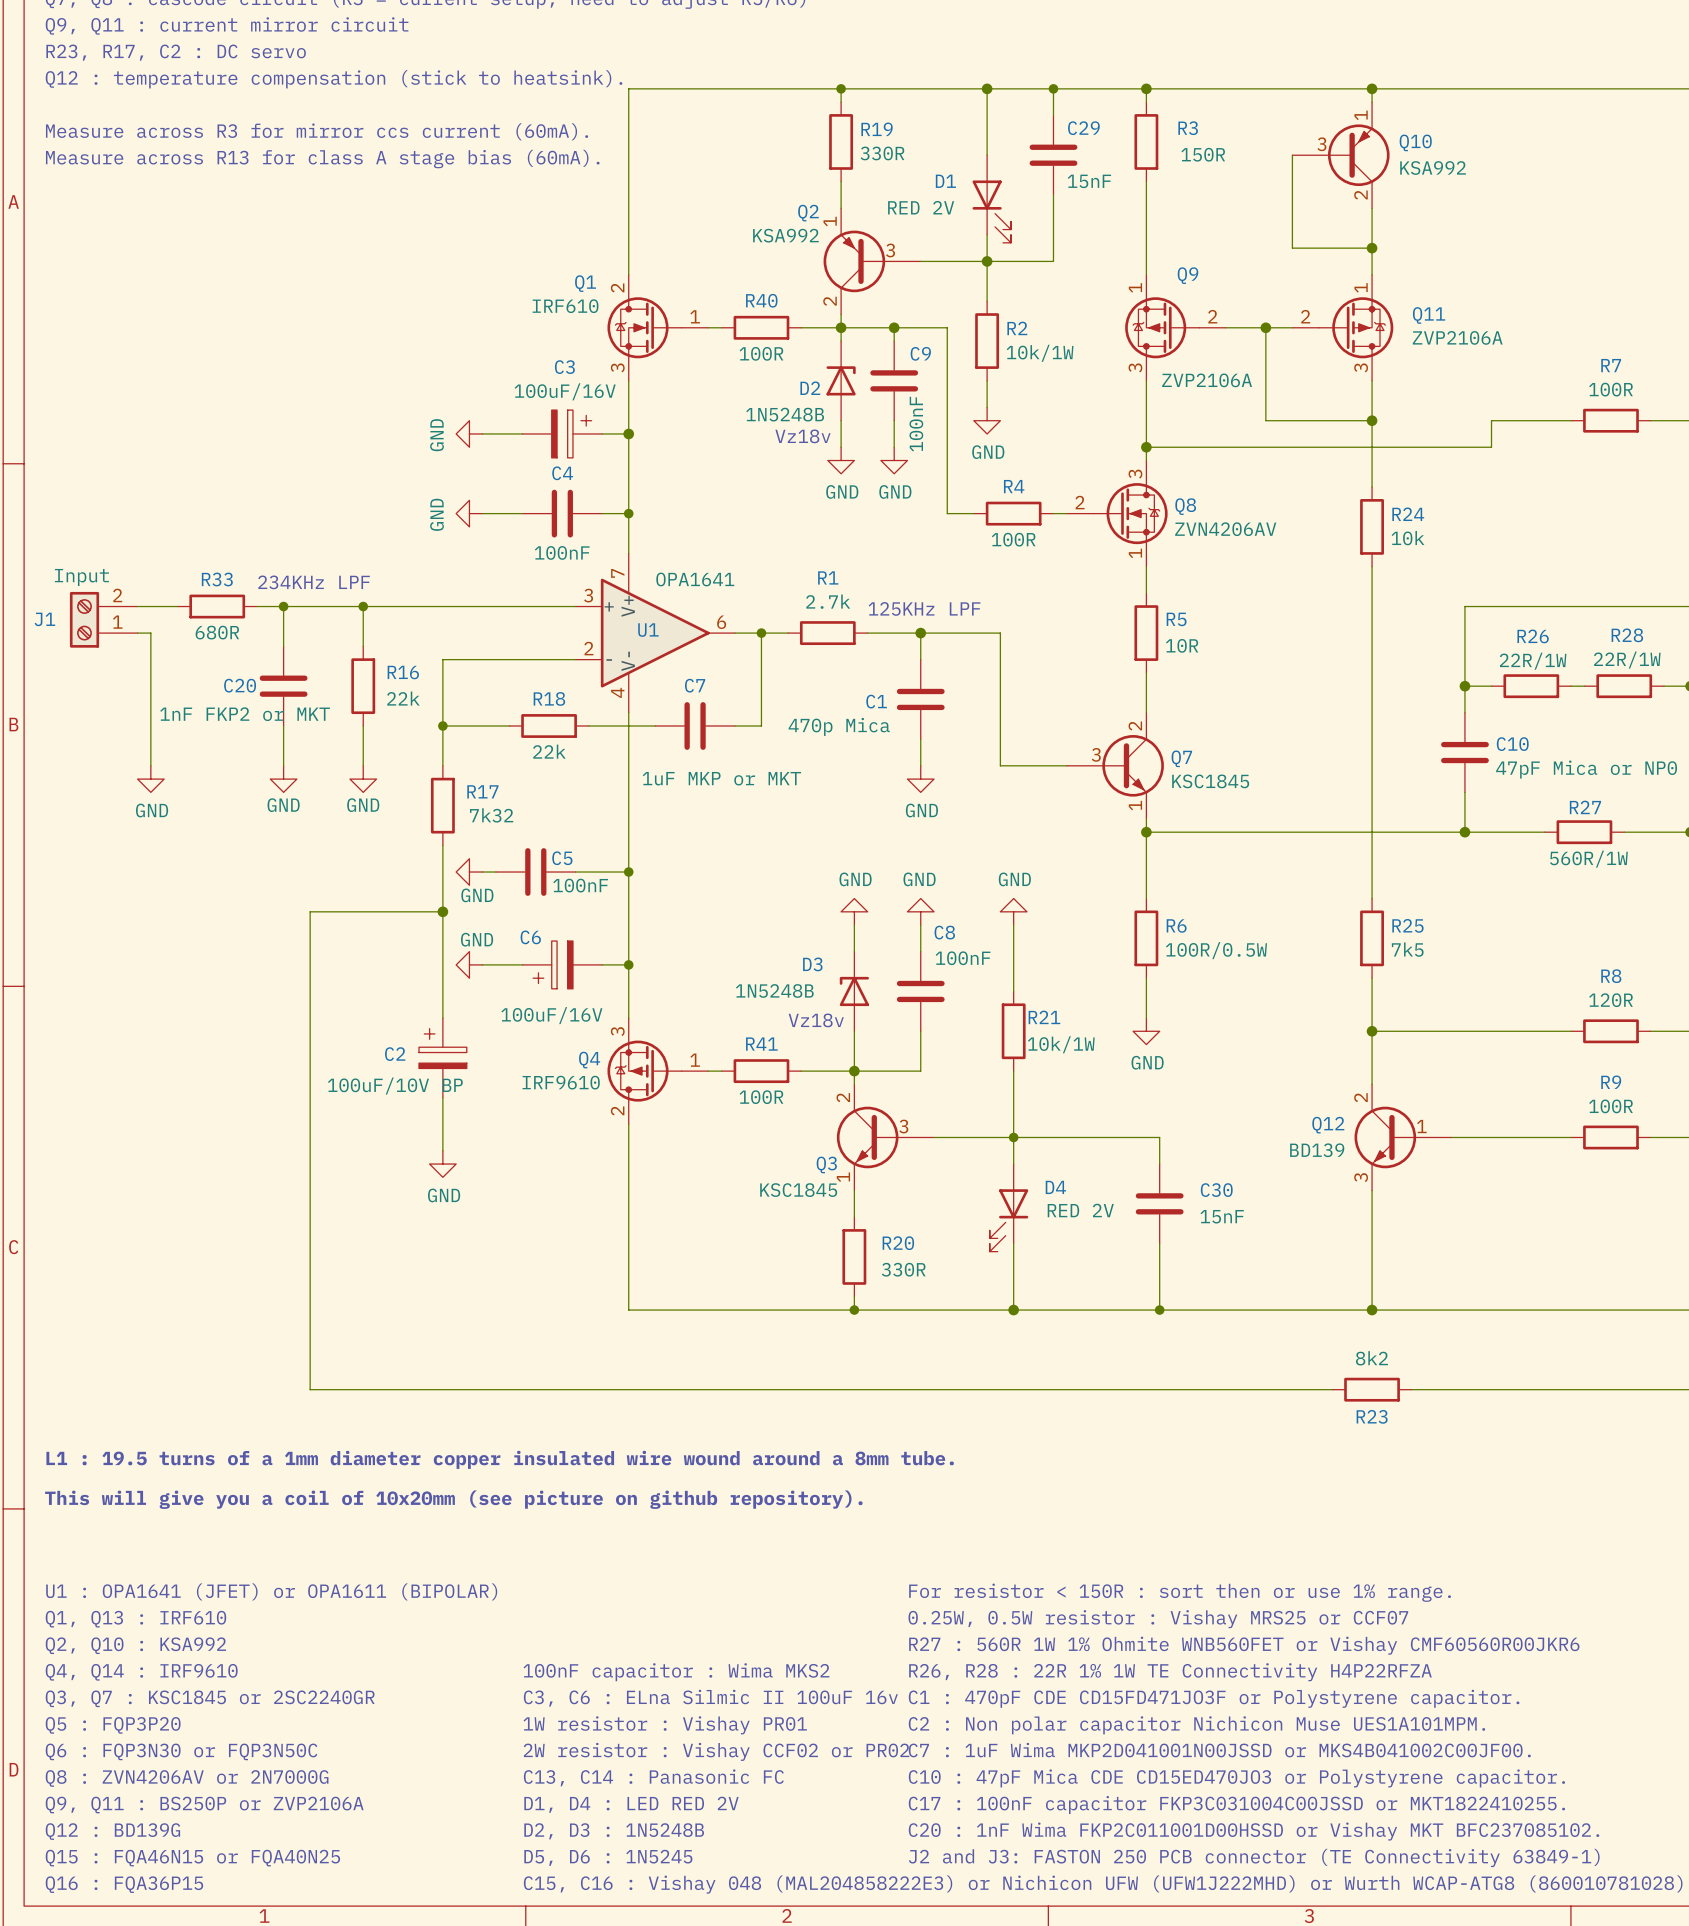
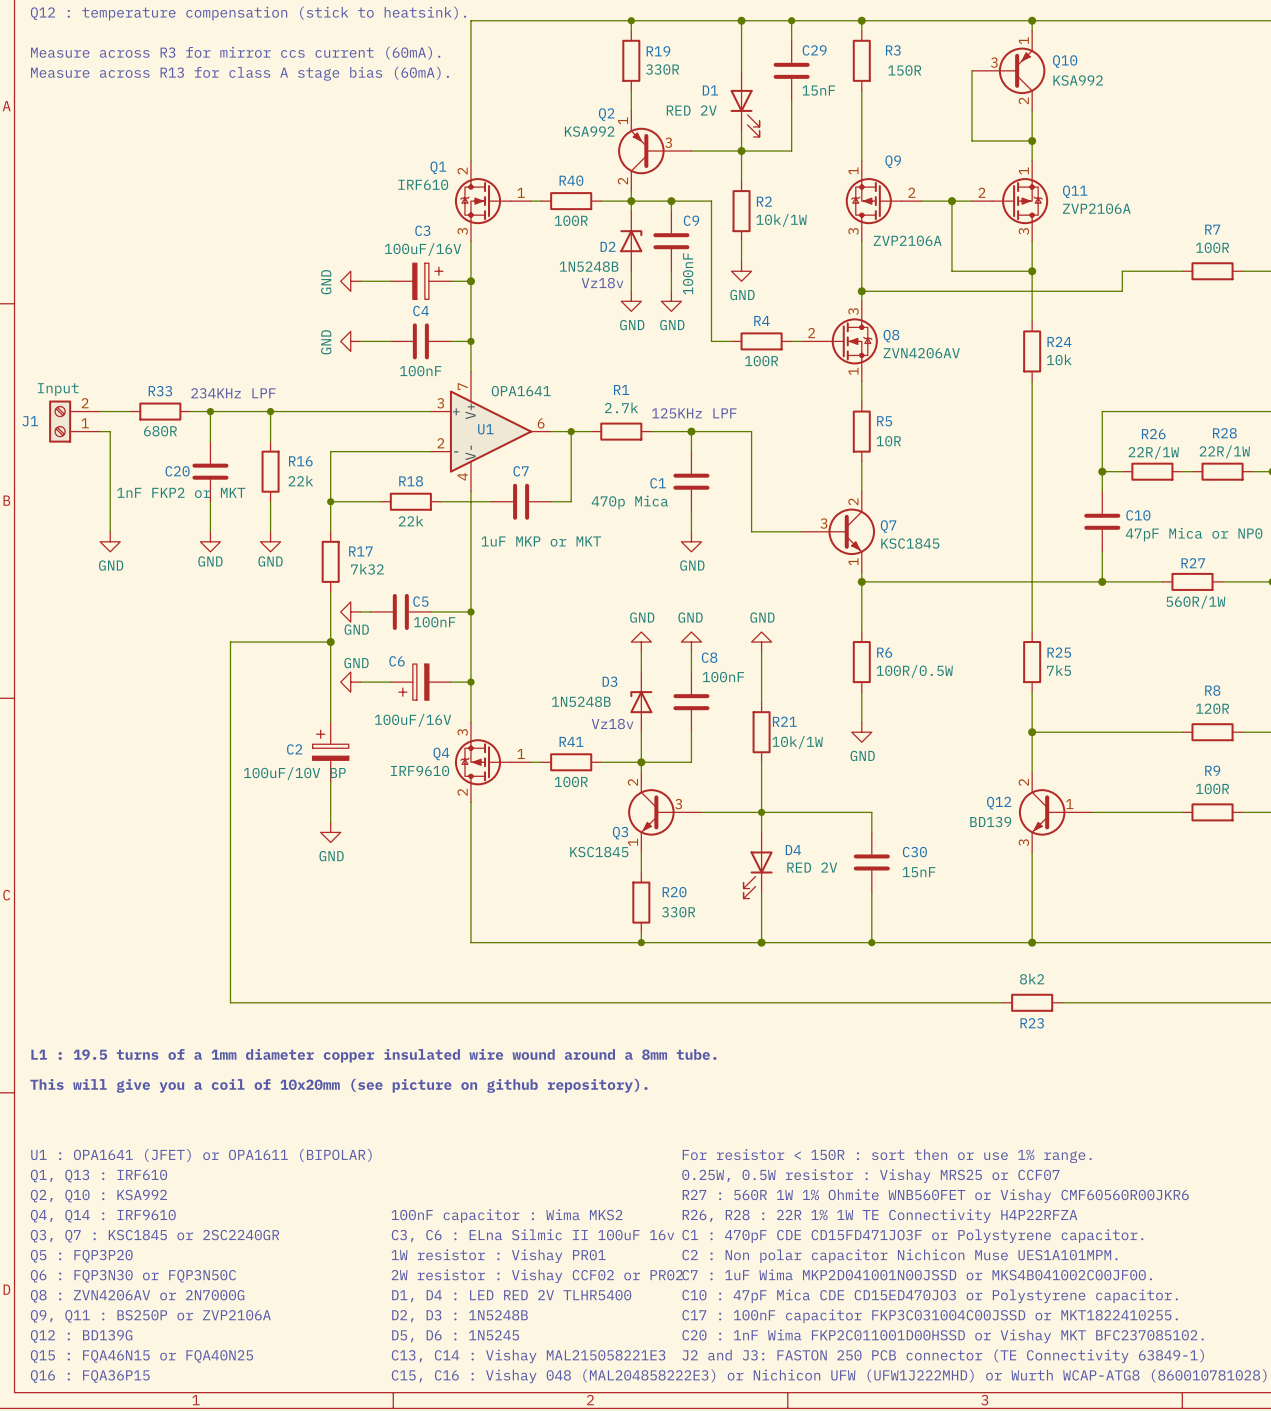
text: C13, C14 : Panasonic FC (653, 1777) -> D1, D4 : LED RED 2V TLHR5400 (511, 1296)
text: D1, D4 : LED RED 2V (631, 1804) -> D2, D3 : 1N5248B (460, 1316)
text: D2, D3 : 1N5248B (614, 1831) -> D5, D6 : 1N5245 (455, 1336)
text: D5, D6 : 1N5245 (608, 1857) -> C13, C14 : Vishay MAL215058221E3 (528, 1356)

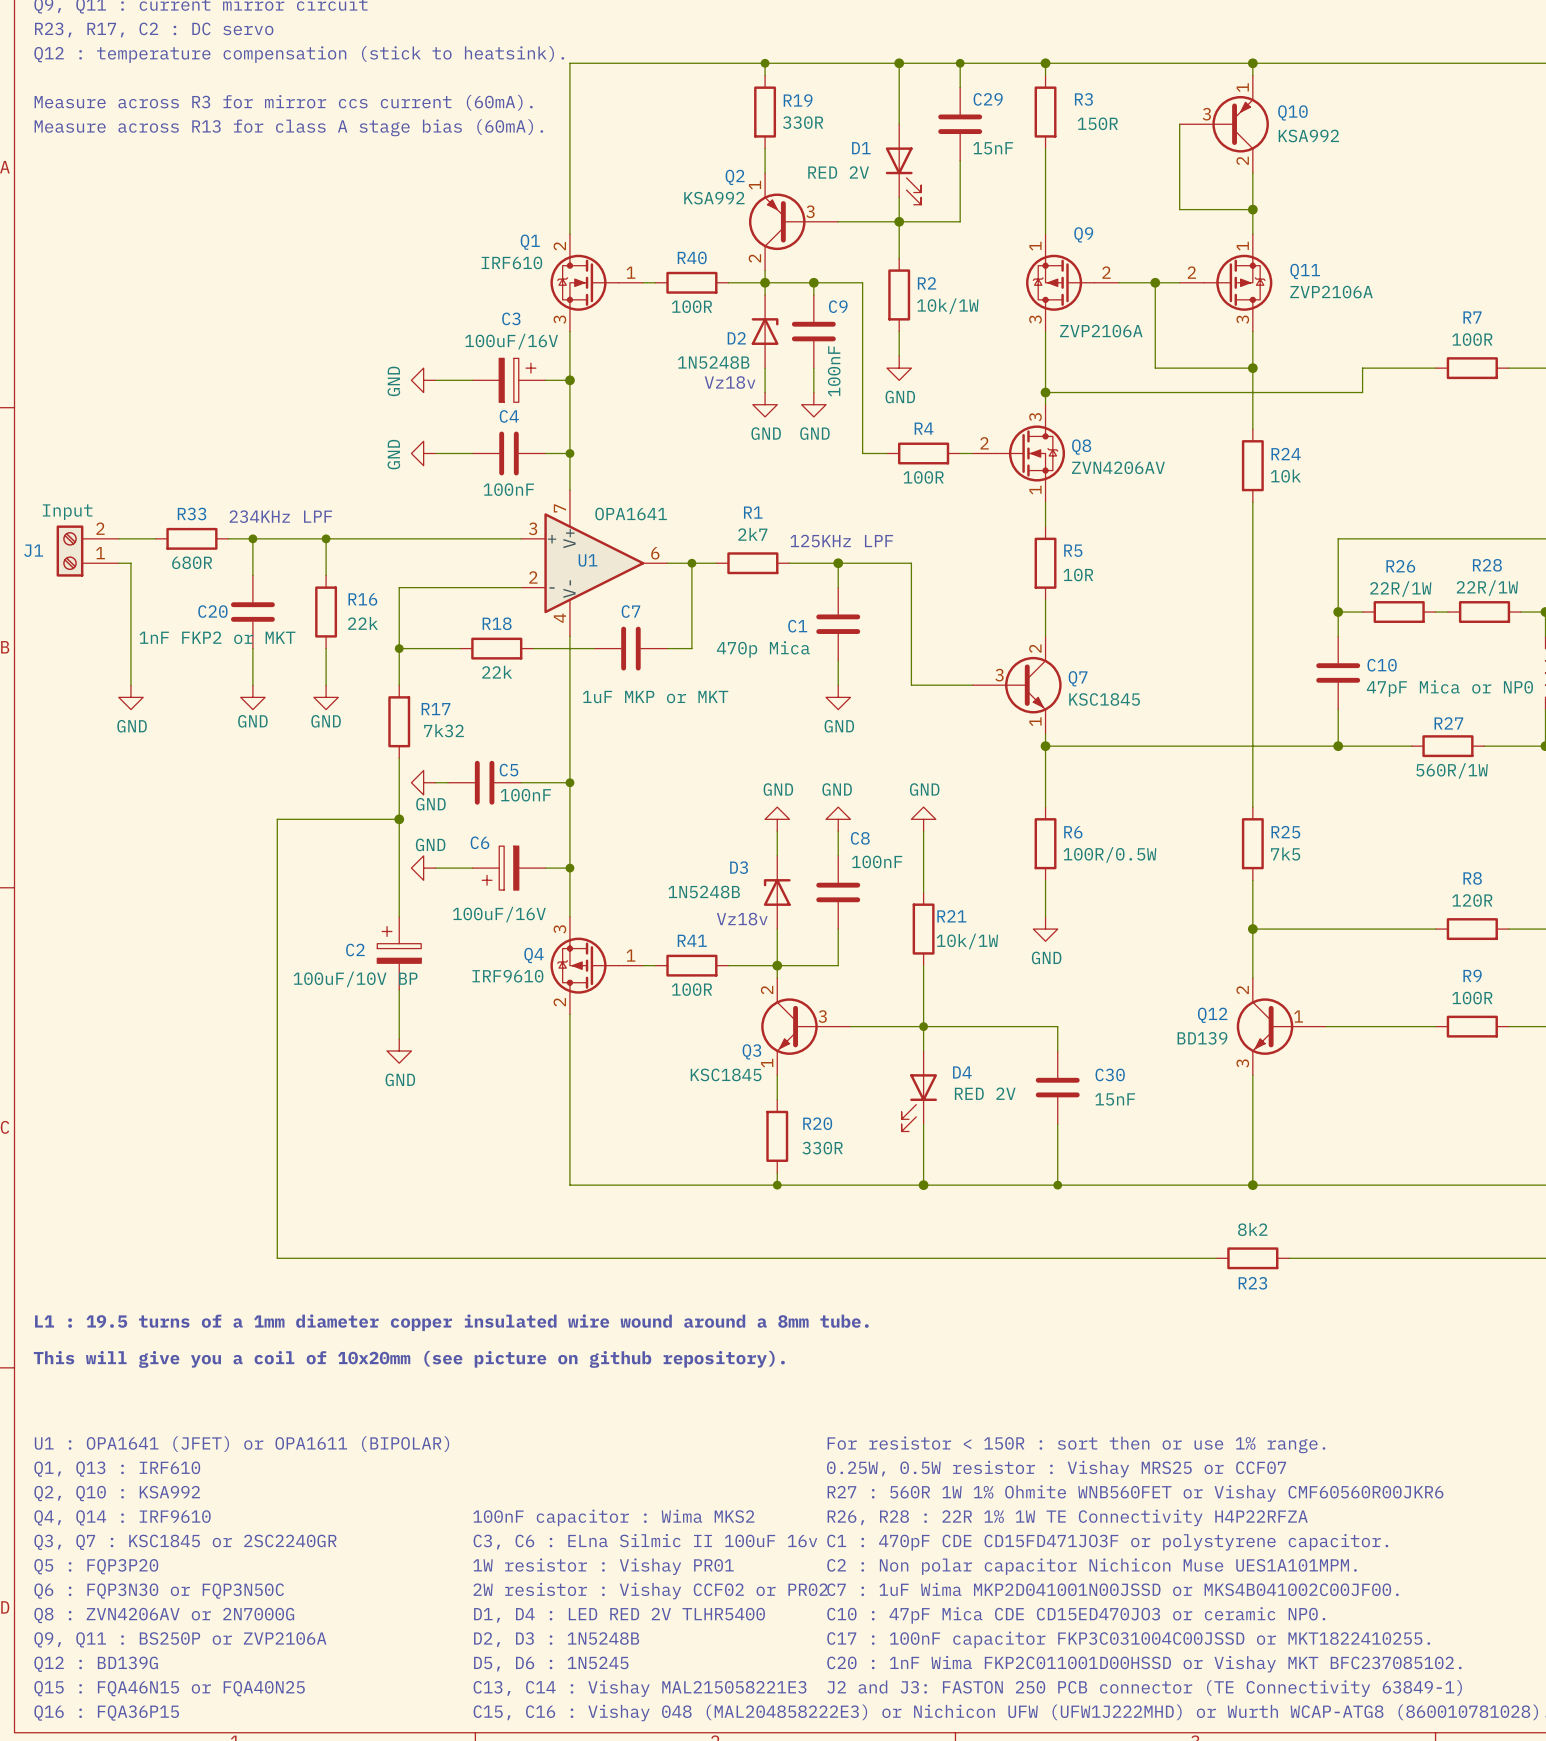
R1 value: 2.7k (621, 407) -> 2k7 (752, 534)
text: C1 : 470pF CDE CD15FD471JO3F or Polystyrene capacitor. (912, 1236) -> C1 : 470pF CDE CD15FD471JO3F or polystyrene capacitor. (1107, 1542)
text: C10 : 47pF Mica CDE CD15ED470JO3 or Polystyrene capacitor. (930, 1296) -> C10 : 47pF Mica CDE CD15ED470JO3 or ceramic NP0. (1076, 1615)

